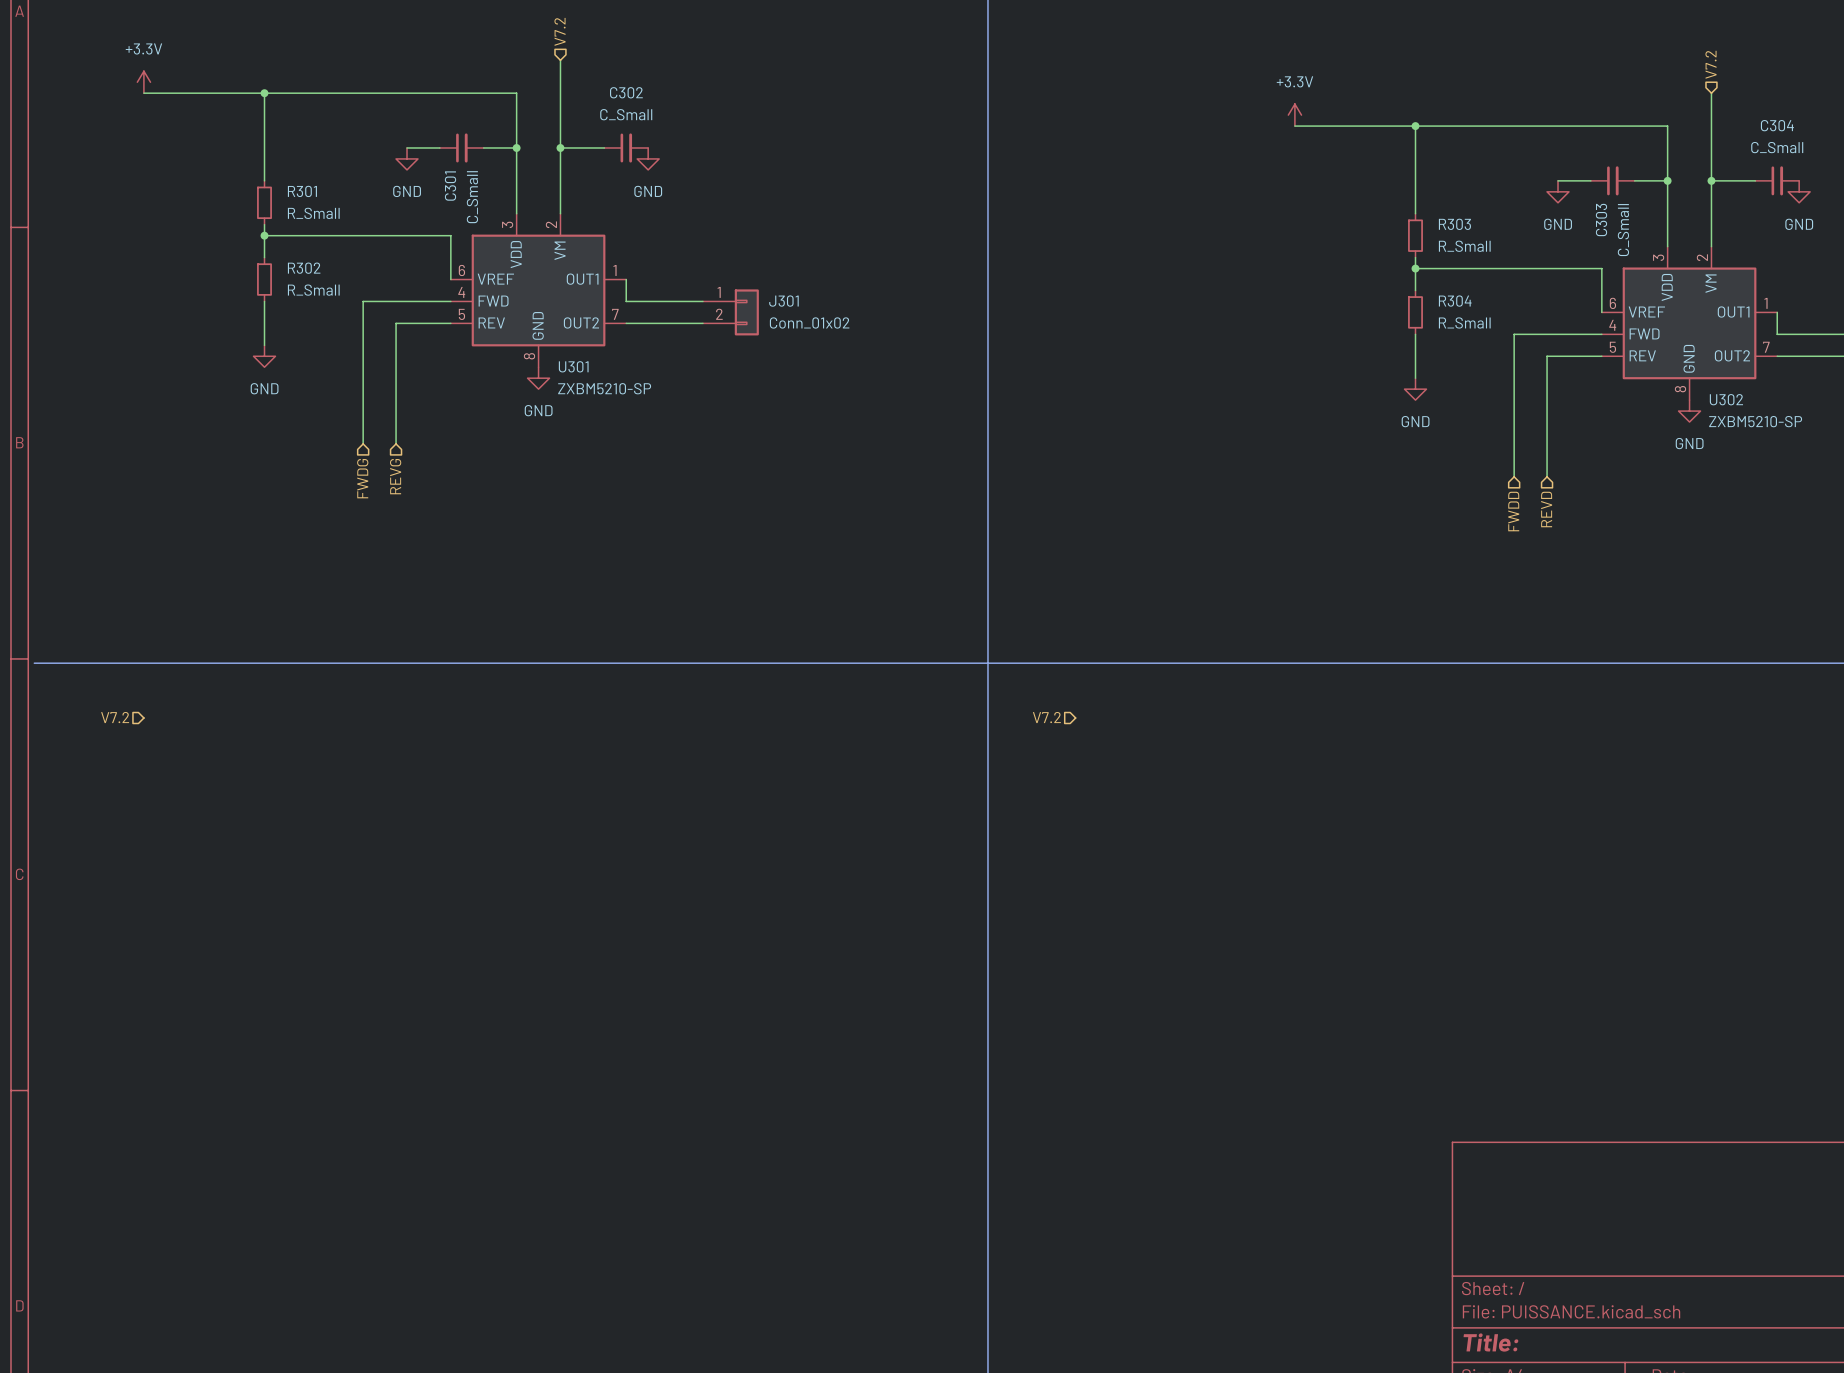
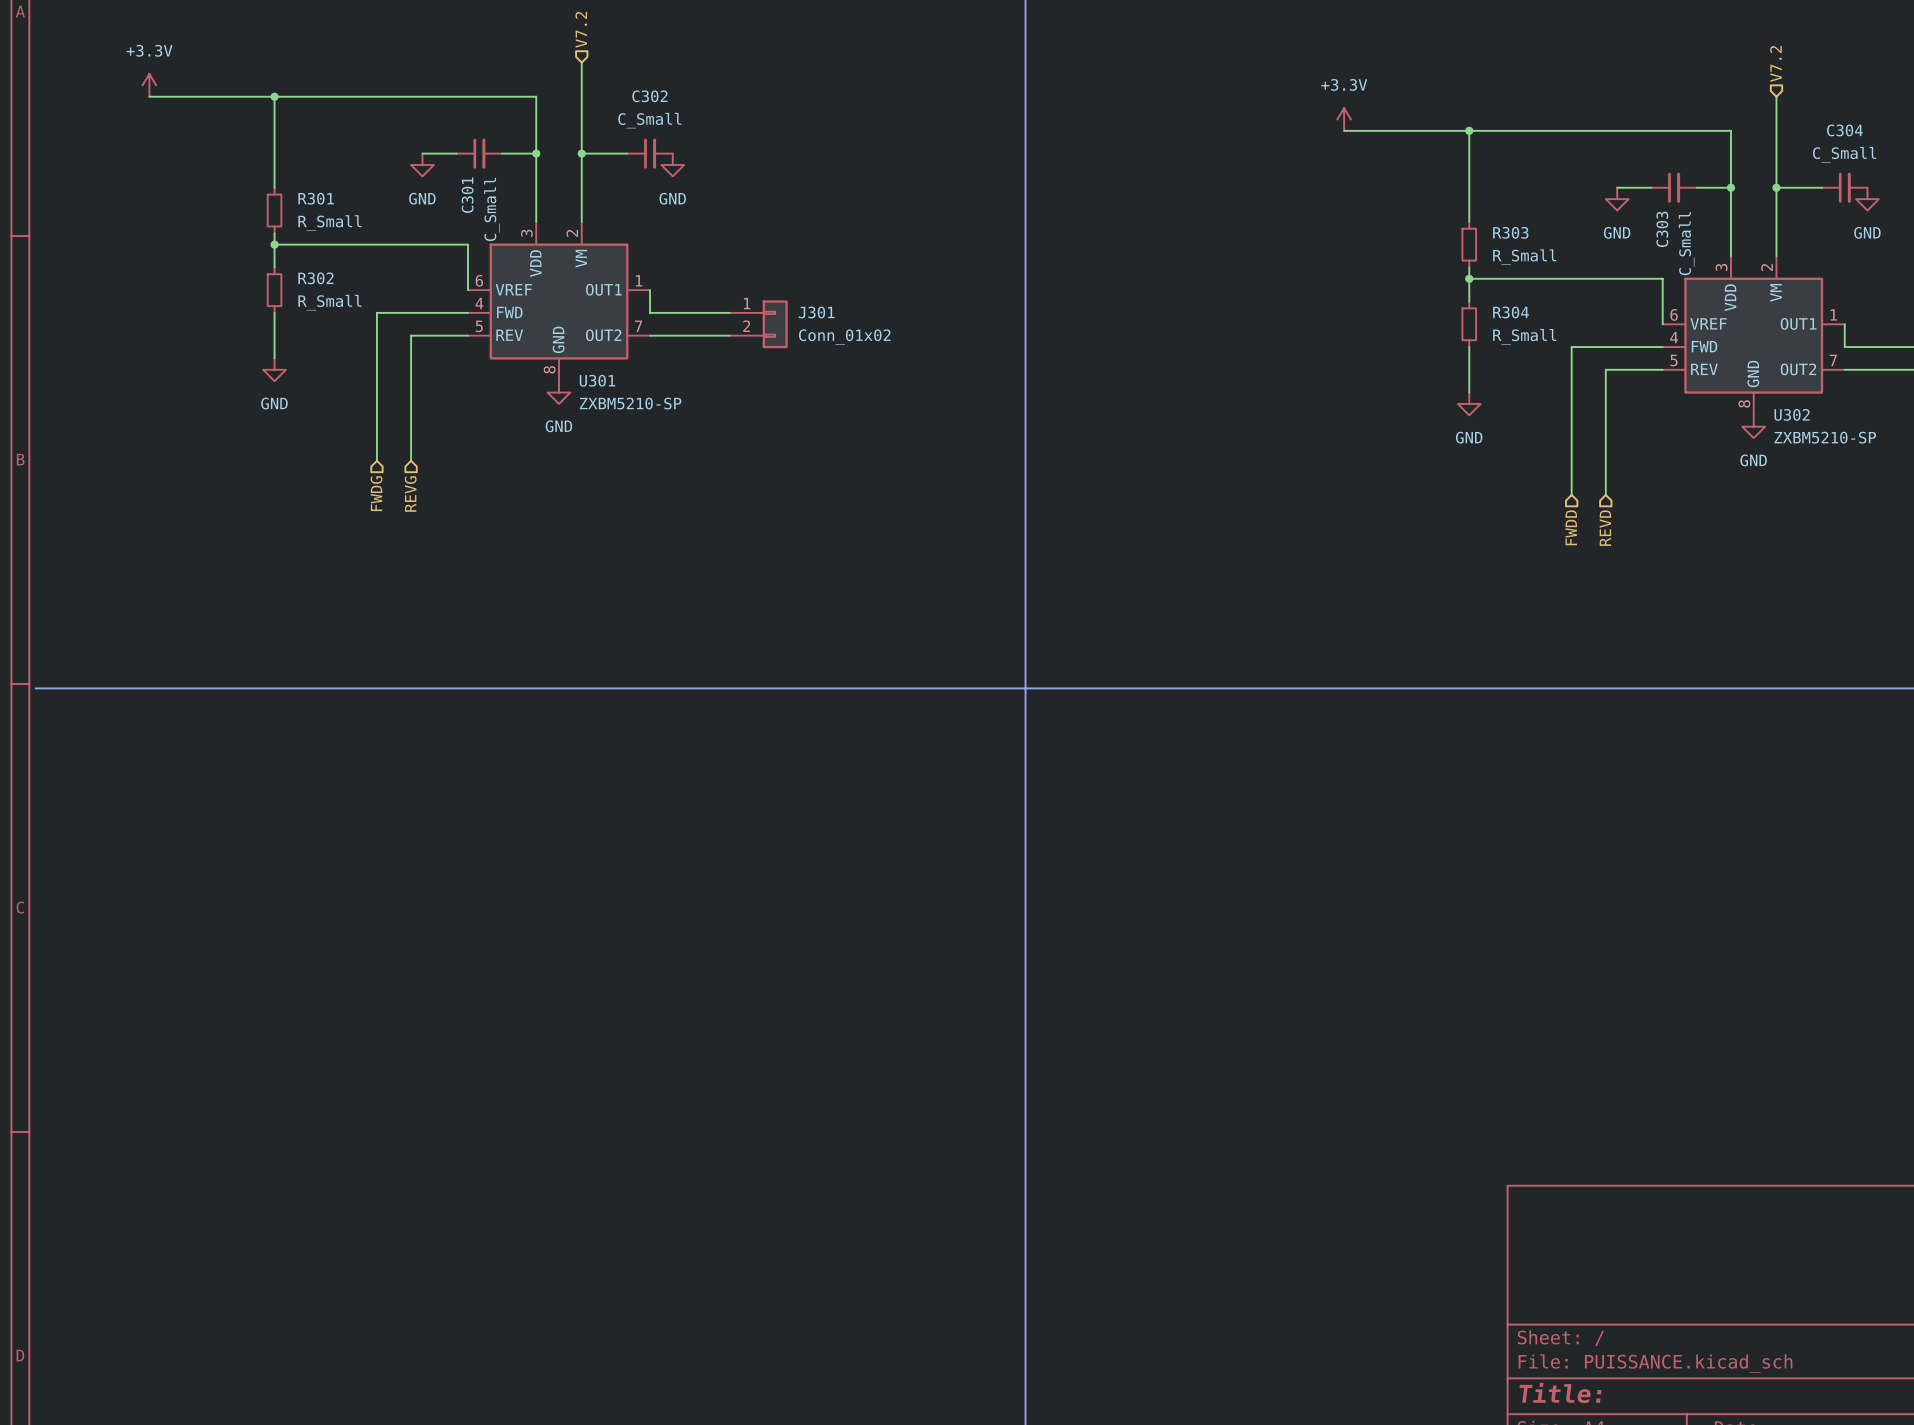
hierarchical label: V7.2 (115, 717) -> none
hierarchical label: V7.2 (1046, 717) -> none

